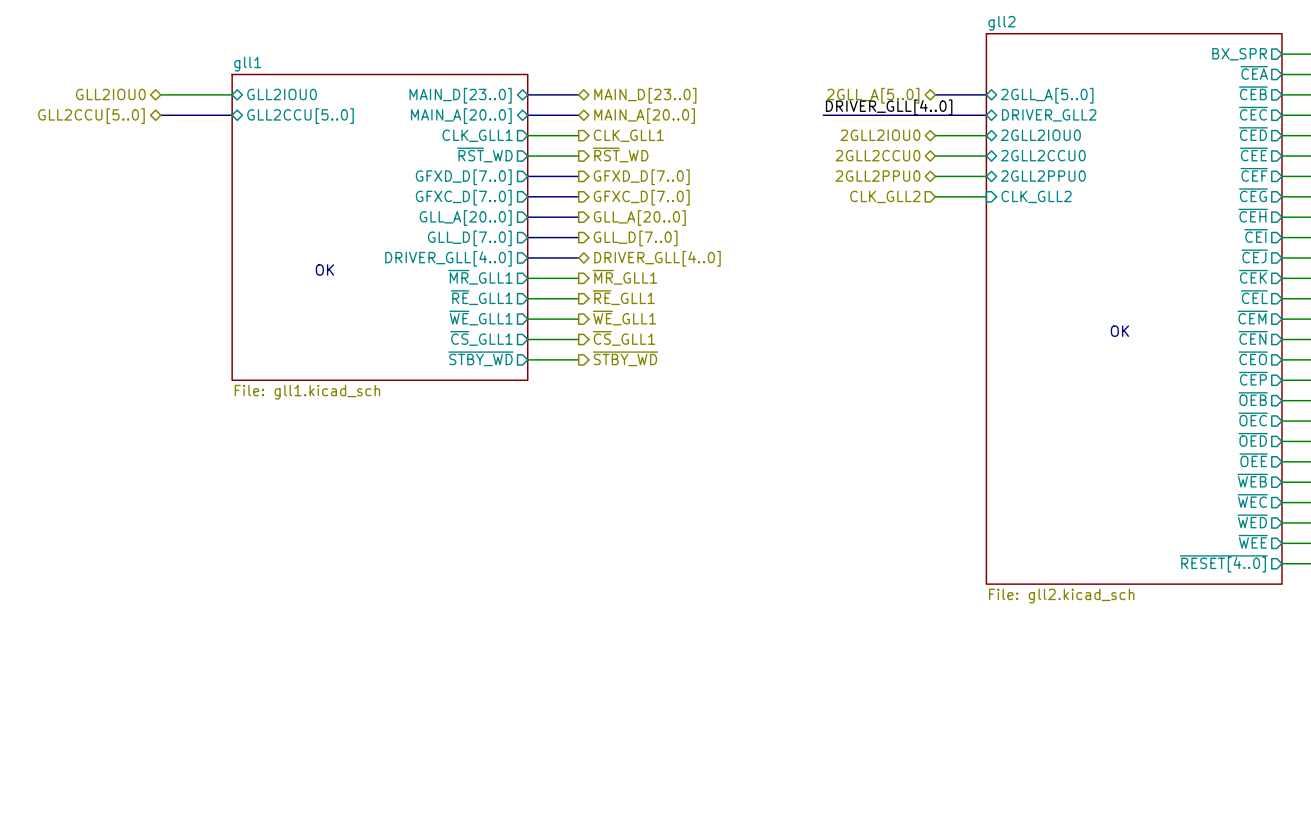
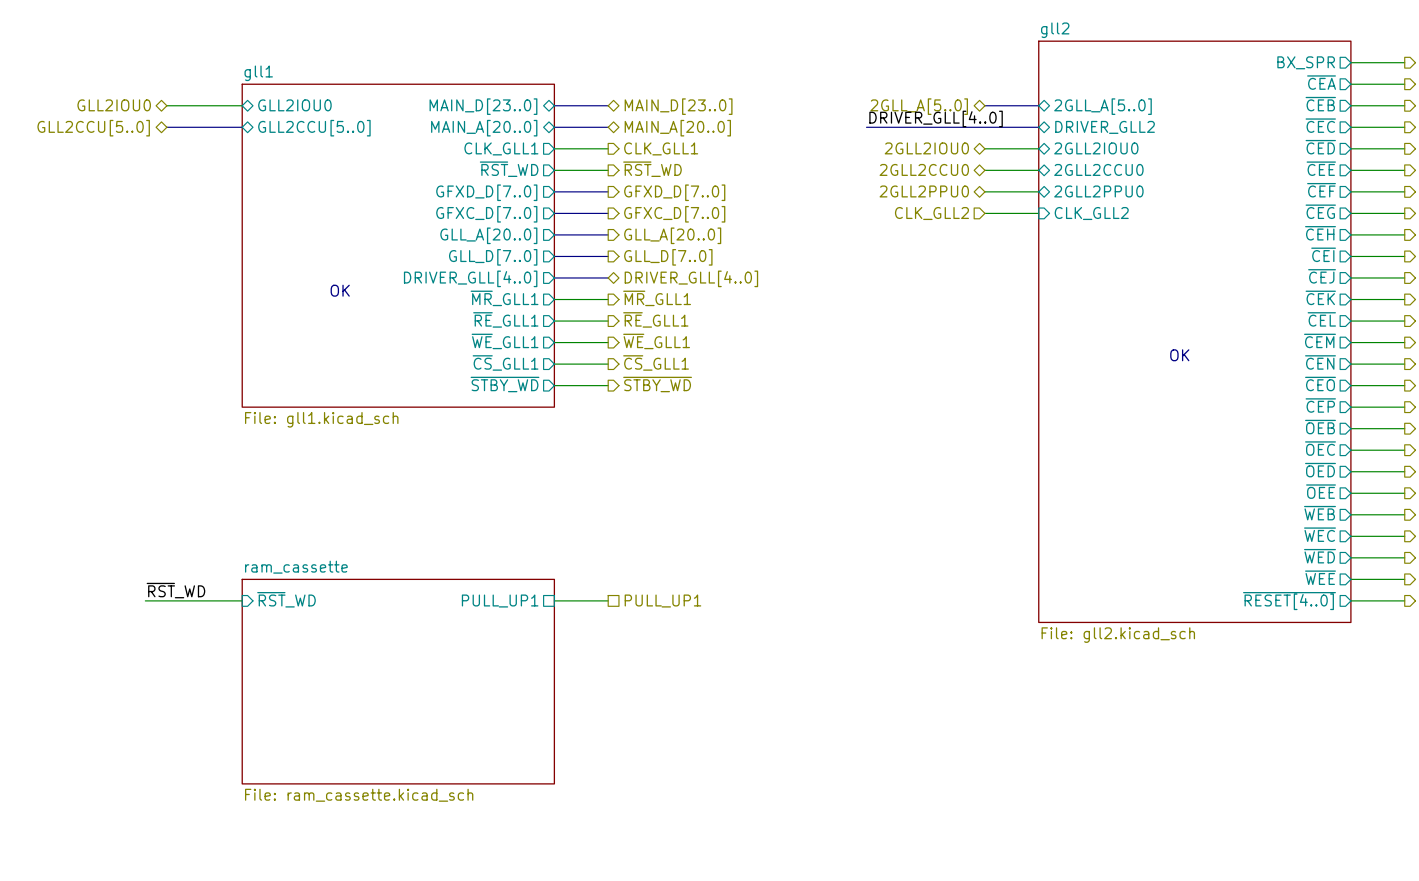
label: none -> ~{RST}_WD (175, 590)
sheet pin: none -> ~{RST}_WD (286, 599)
wire: none -> (145, 600) (242, 600)
sheet pin: none -> PULL_UP1 (500, 601)
wire: none -> (554, 600) (608, 600)
hierarchical label: none -> PULL_UP1 (662, 601)
sheet ram_cassette: none -> File: ram_cassette.kicad_sch (398, 681)

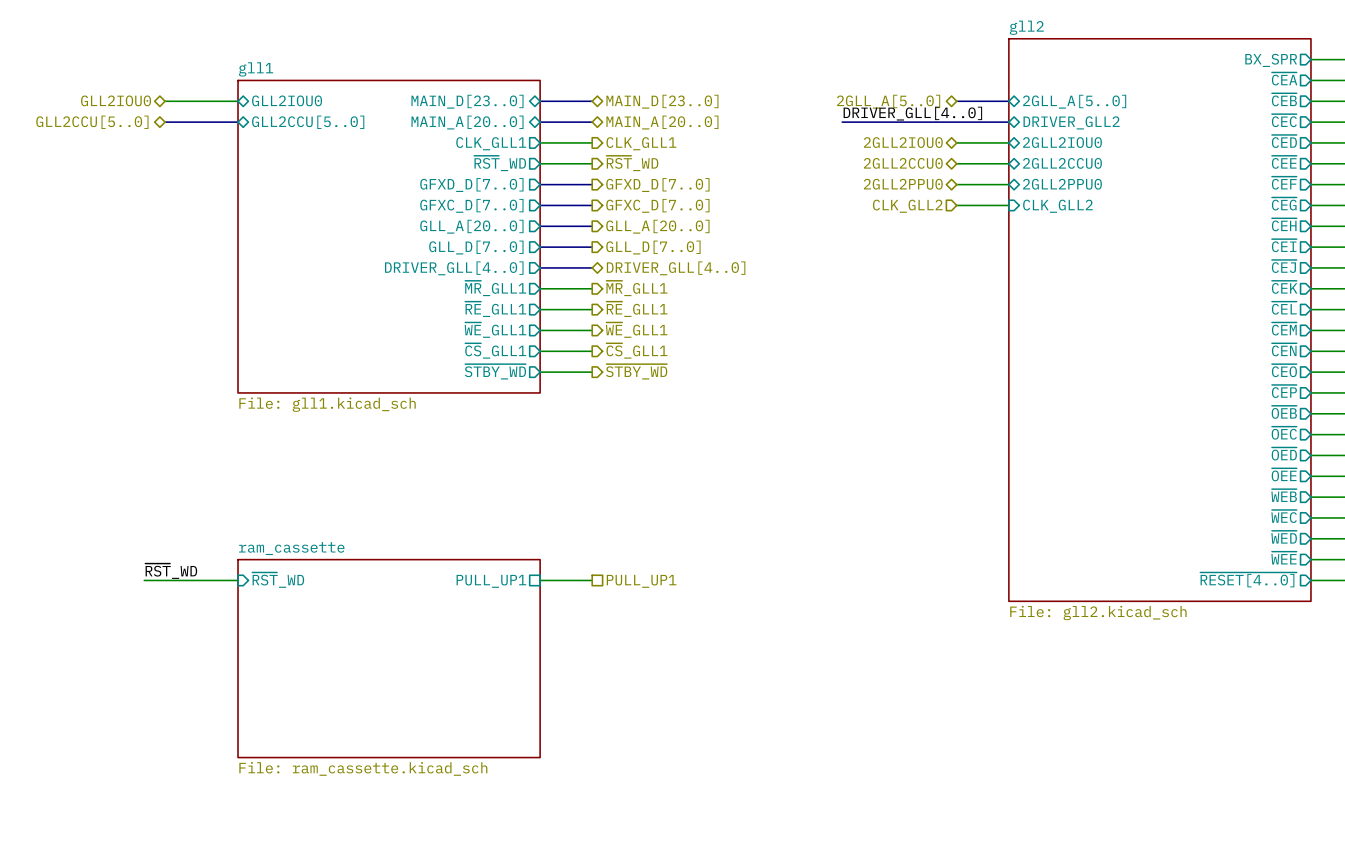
text: OK (340, 290) -> none
text: OK (1179, 355) -> none

